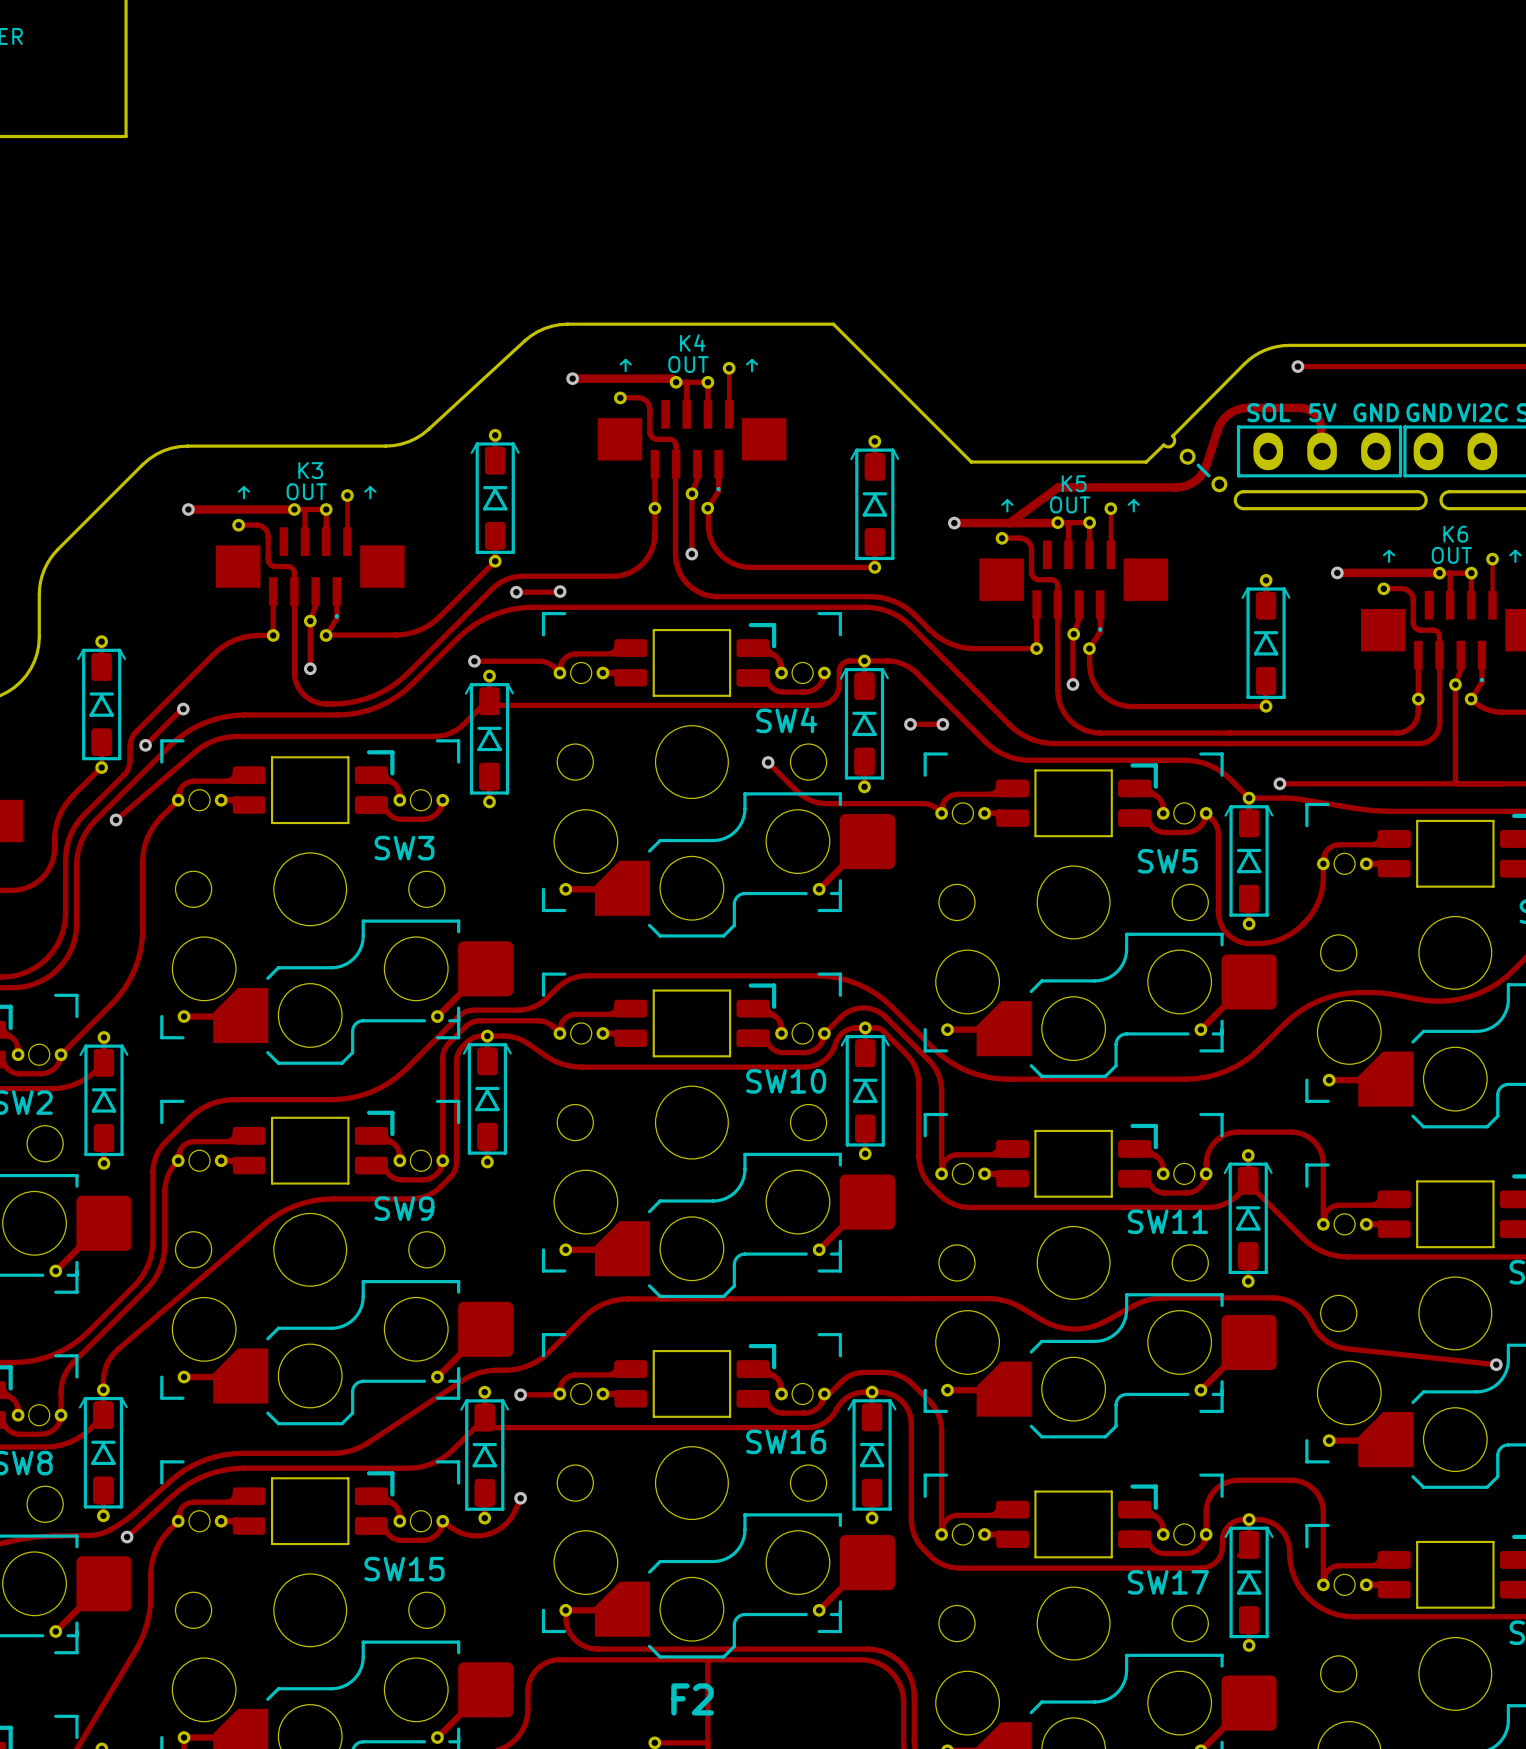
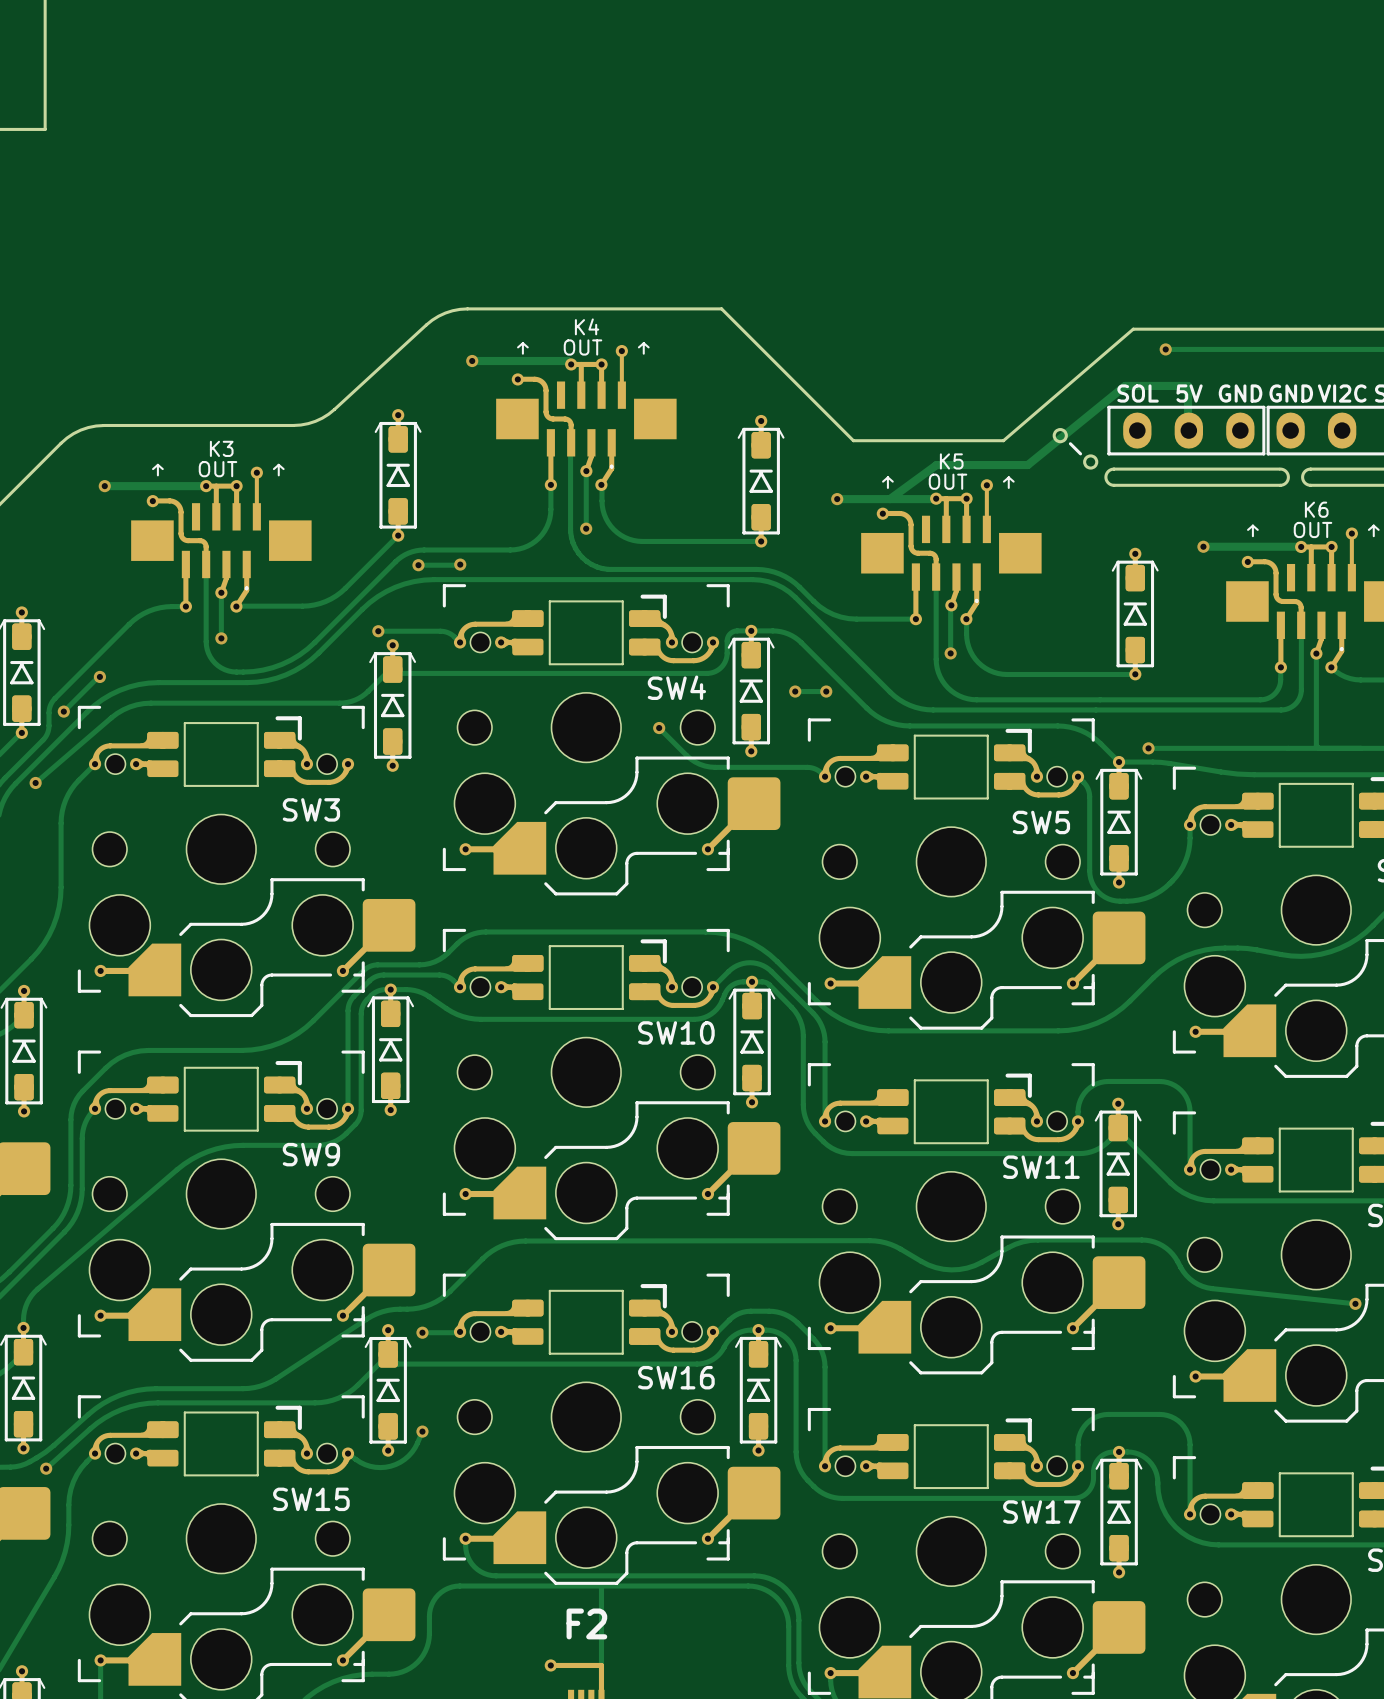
board edge: (1289, 345) (1270, 348) (1248, 359) (1172, 436) (1174, 440) (1172, 445) (1167, 446) (1163, 445) (1146, 462) (1128, 462) -> (1157, 329) (1133, 329) (1003, 440)
track: (1321, 429) (1316, 415) (1304, 408) (1247, 407) (1236, 410) (1229, 414) (1221, 422) (1204, 469) (1197, 478) (1183, 486) (1153, 487) -> (1188, 409) (1188, 385) (1125, 385) (1027, 465)

